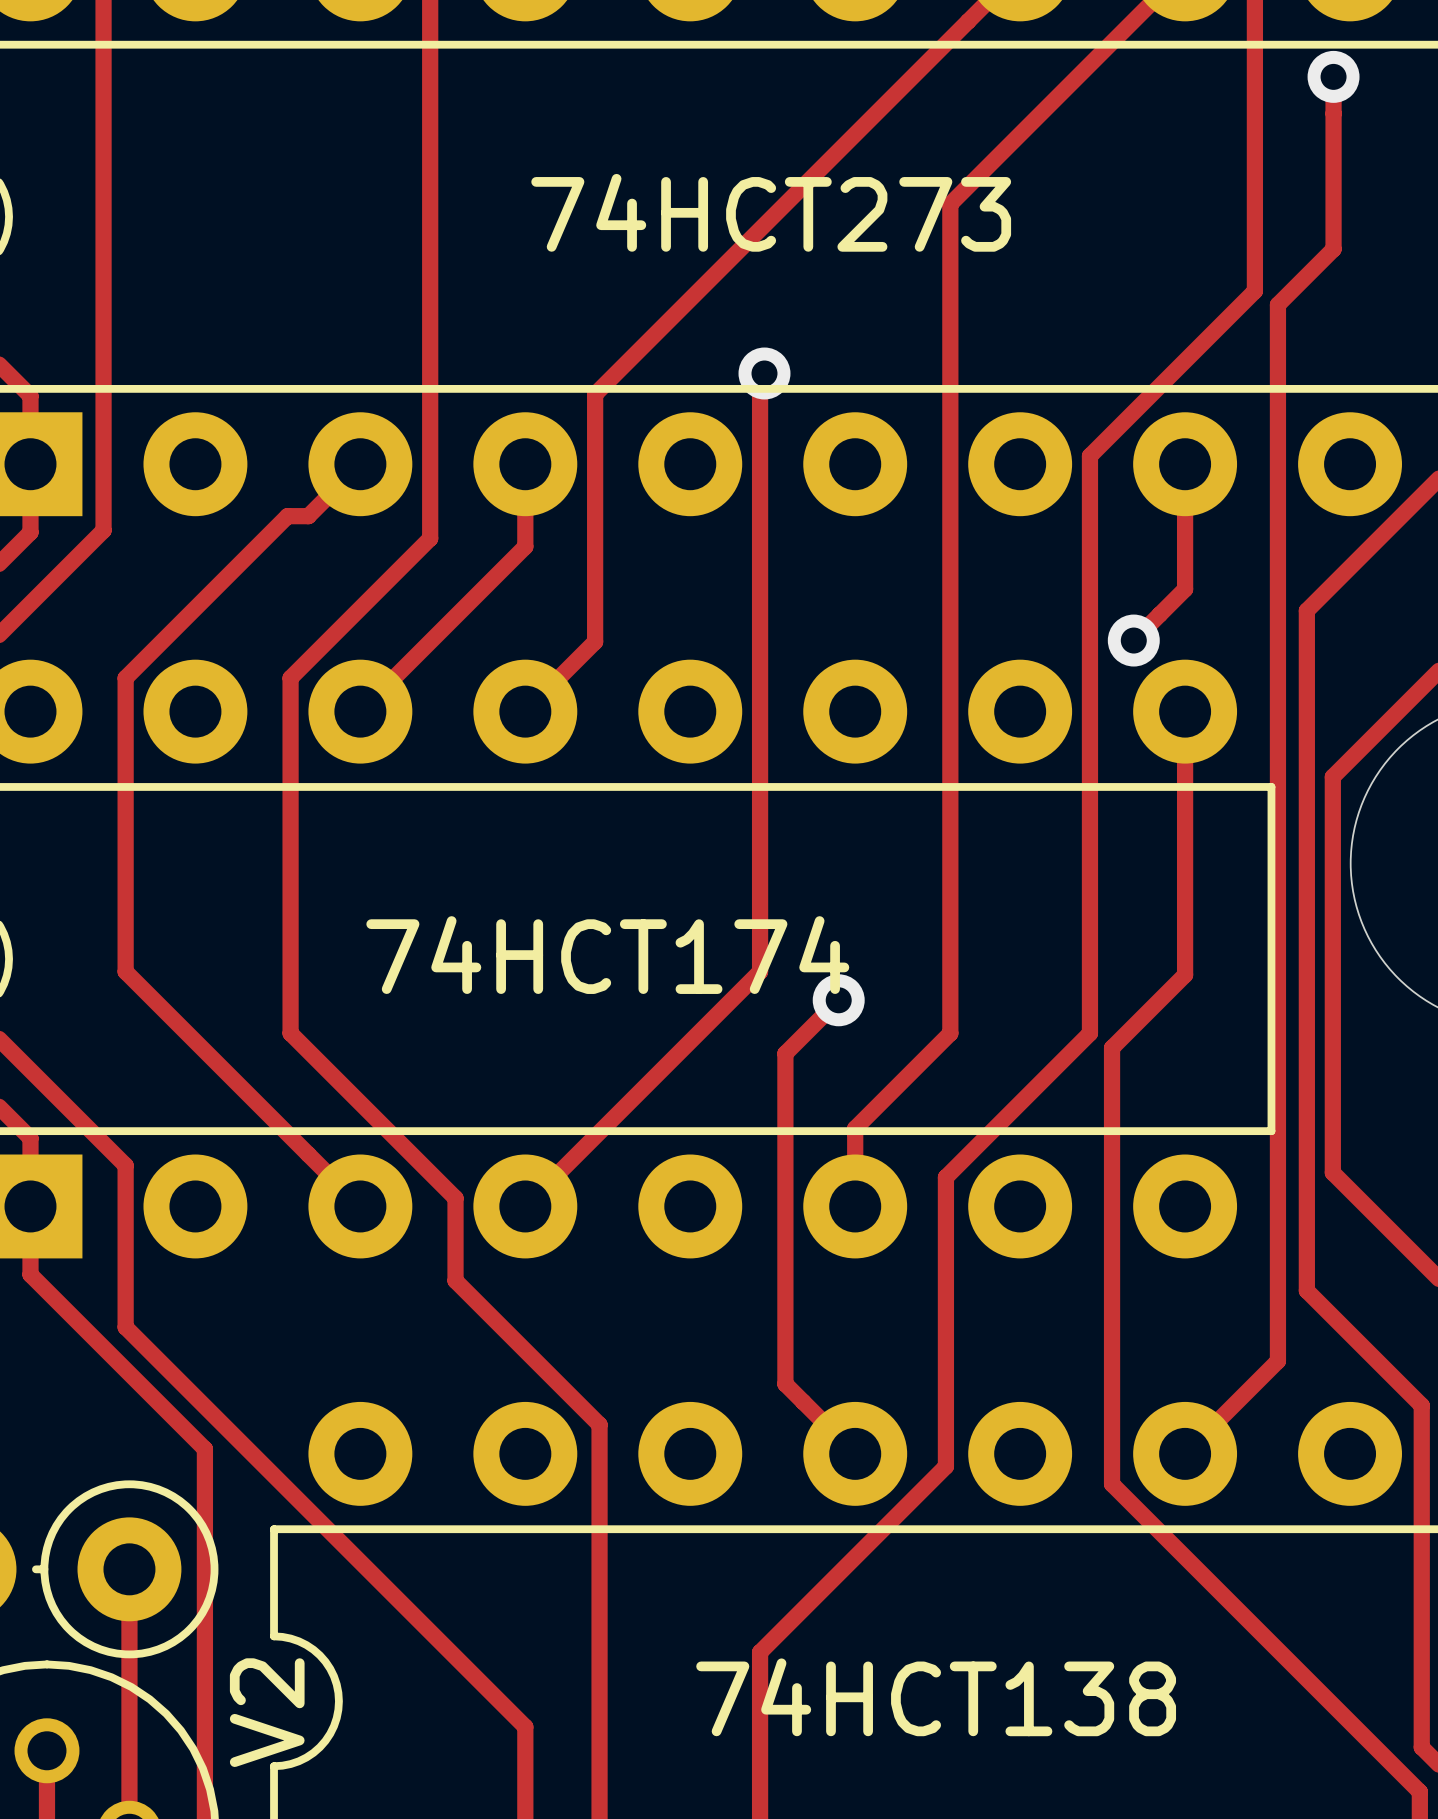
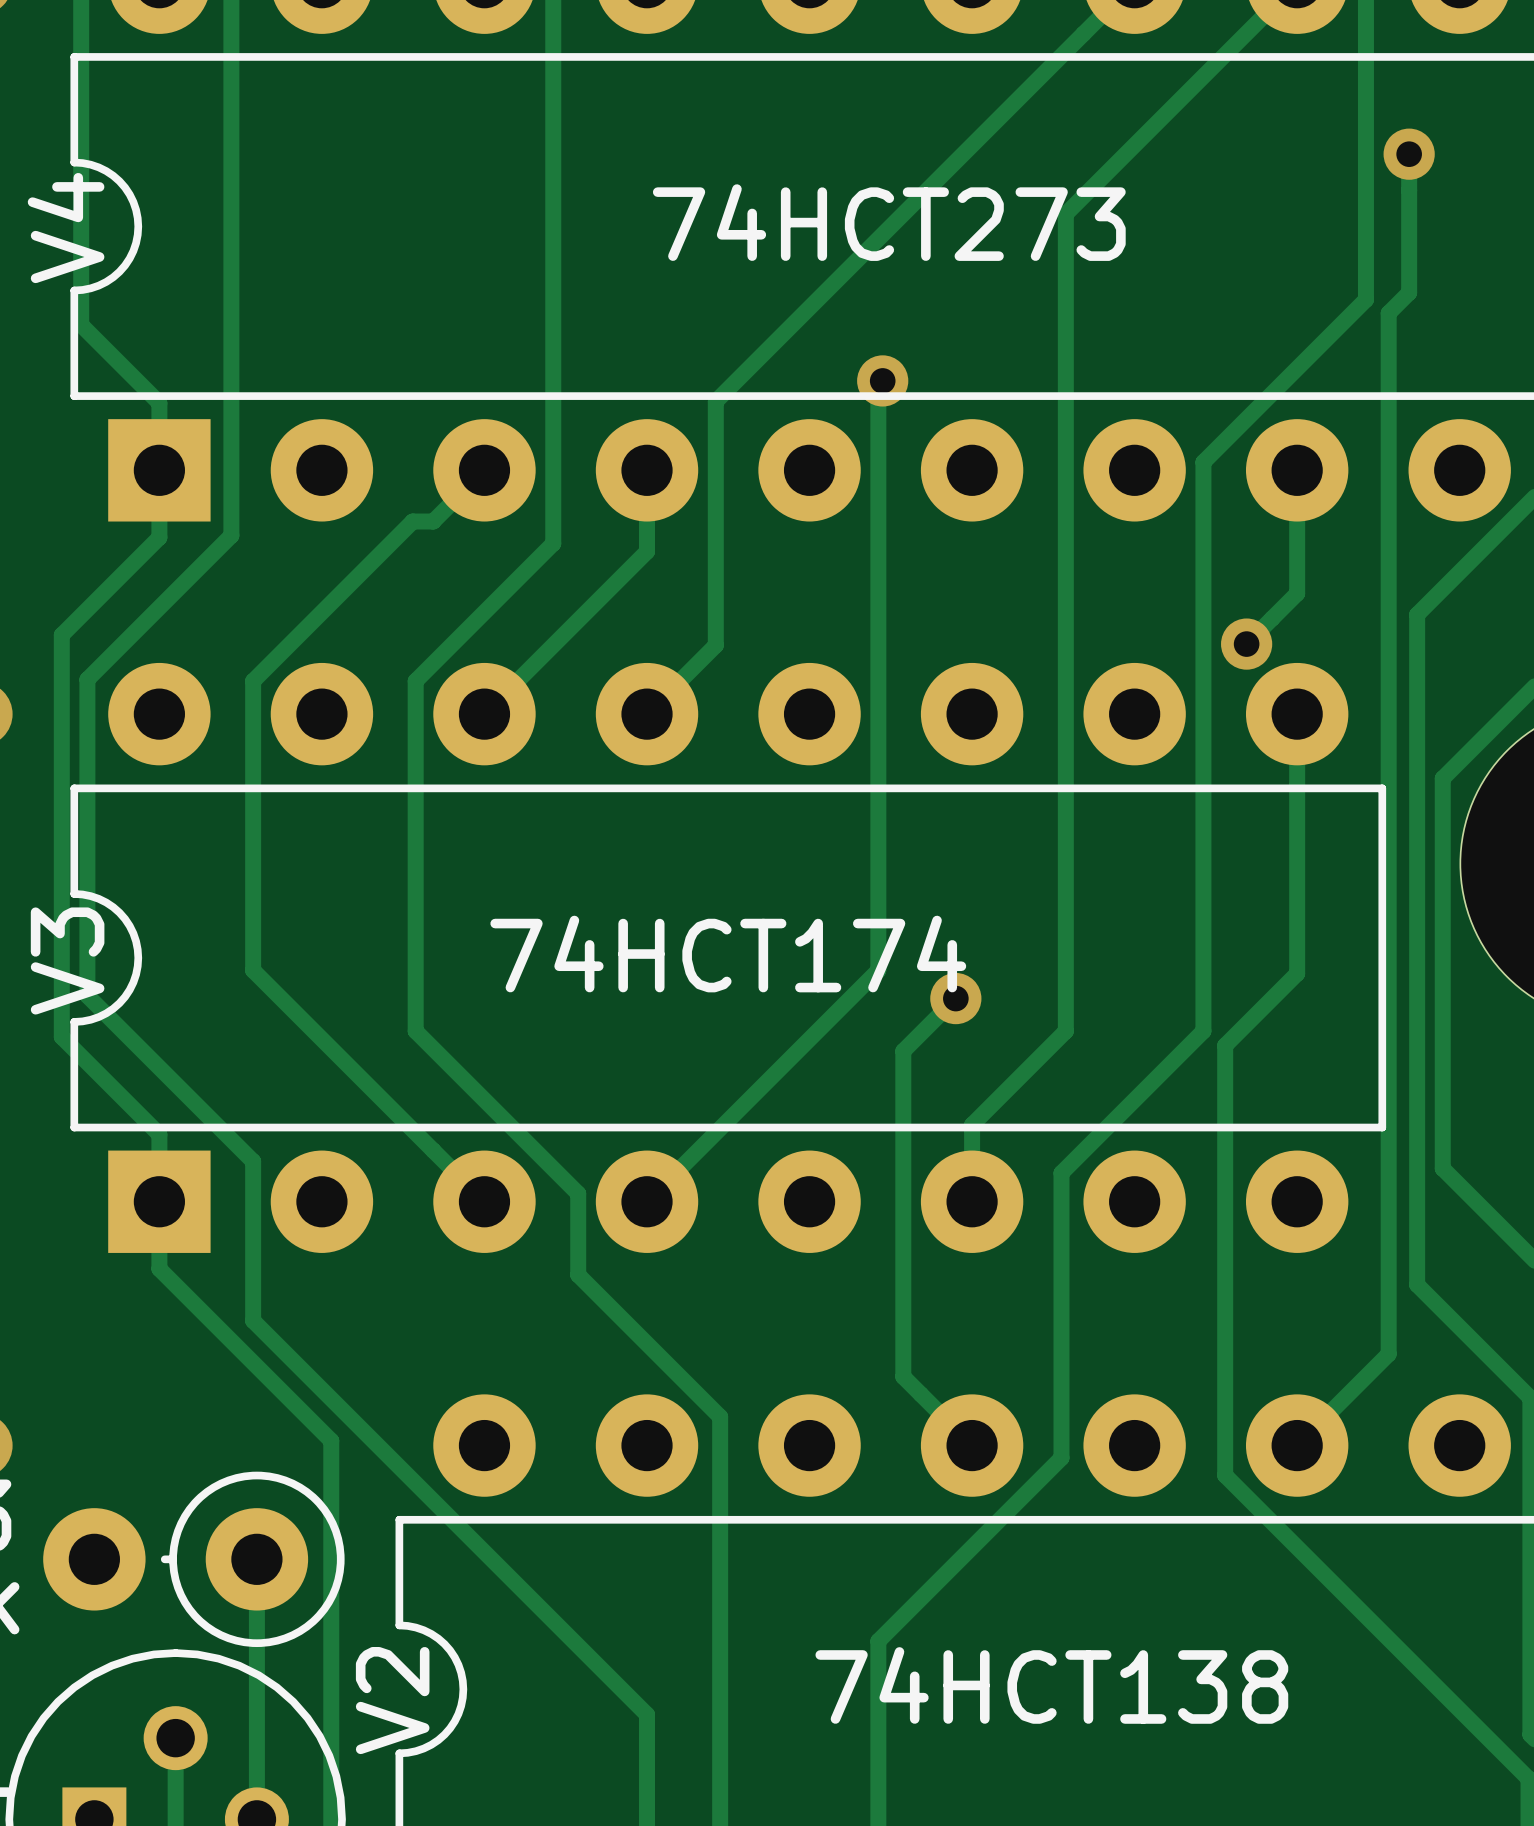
track: (1333, 76) (1333, 249) (1298, 283) -> (1409, 154) (1409, 292)
via position: (1333, 76) -> (1409, 154)

